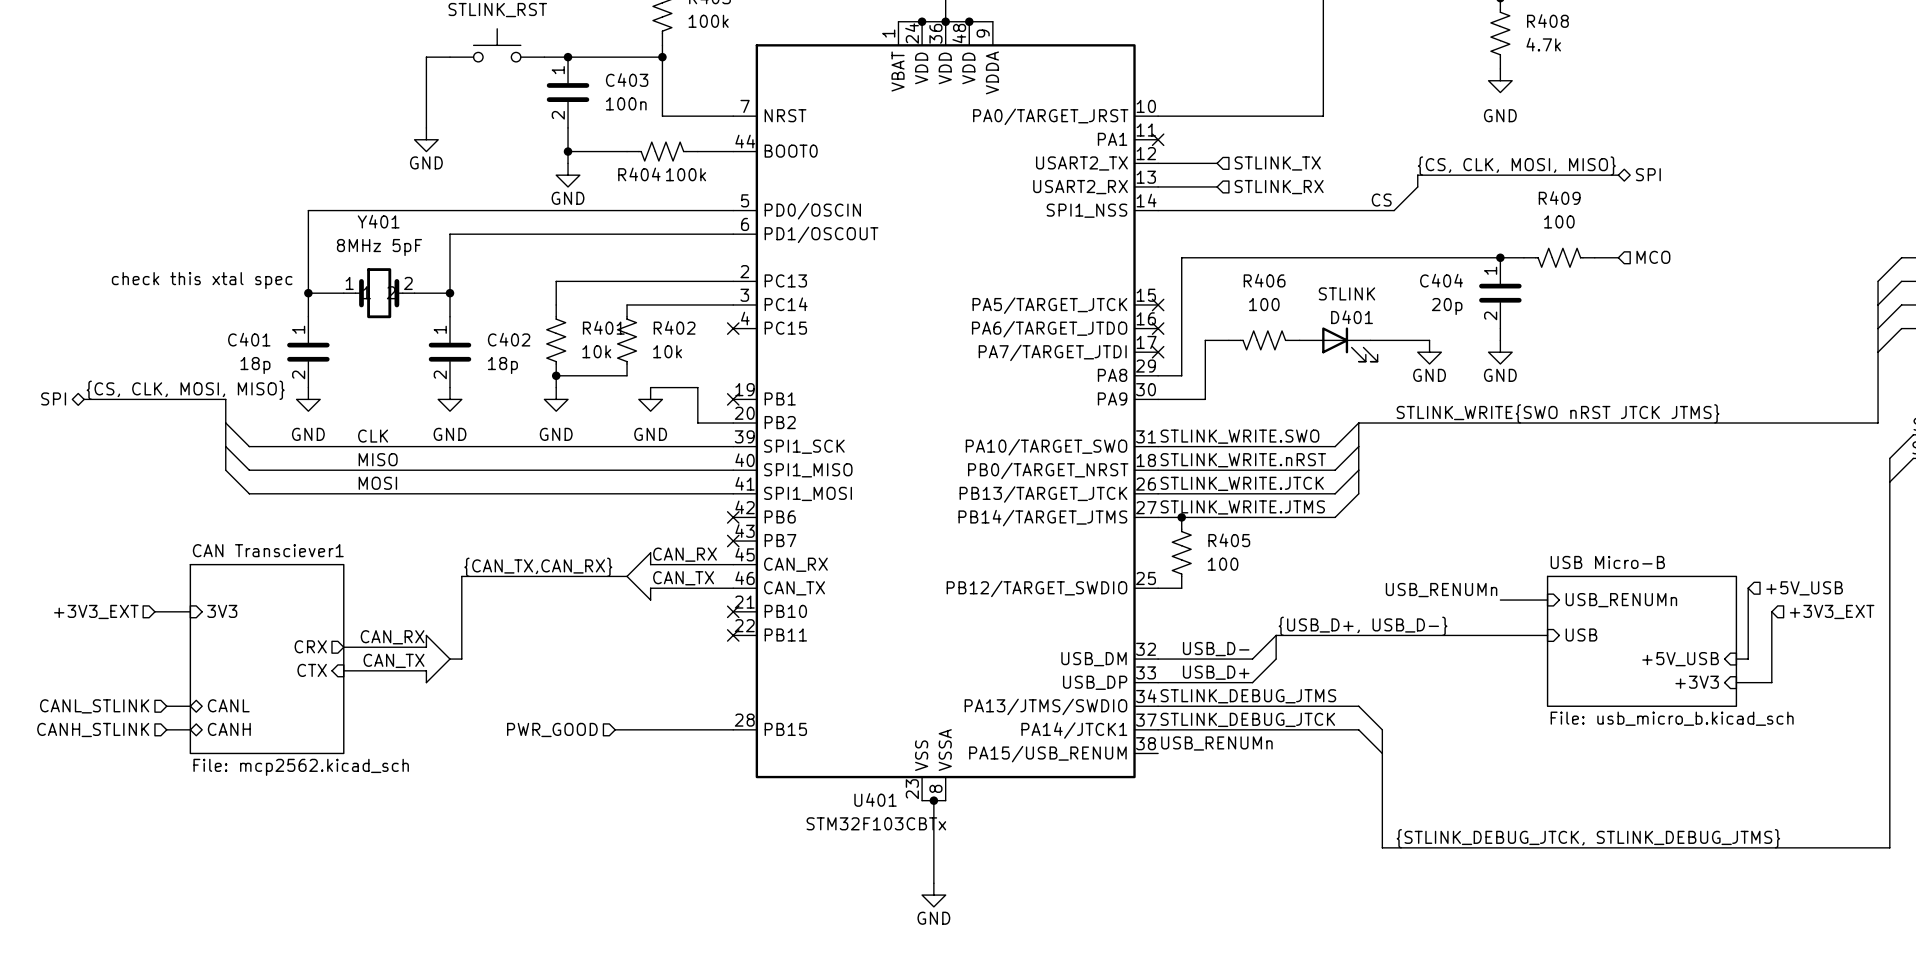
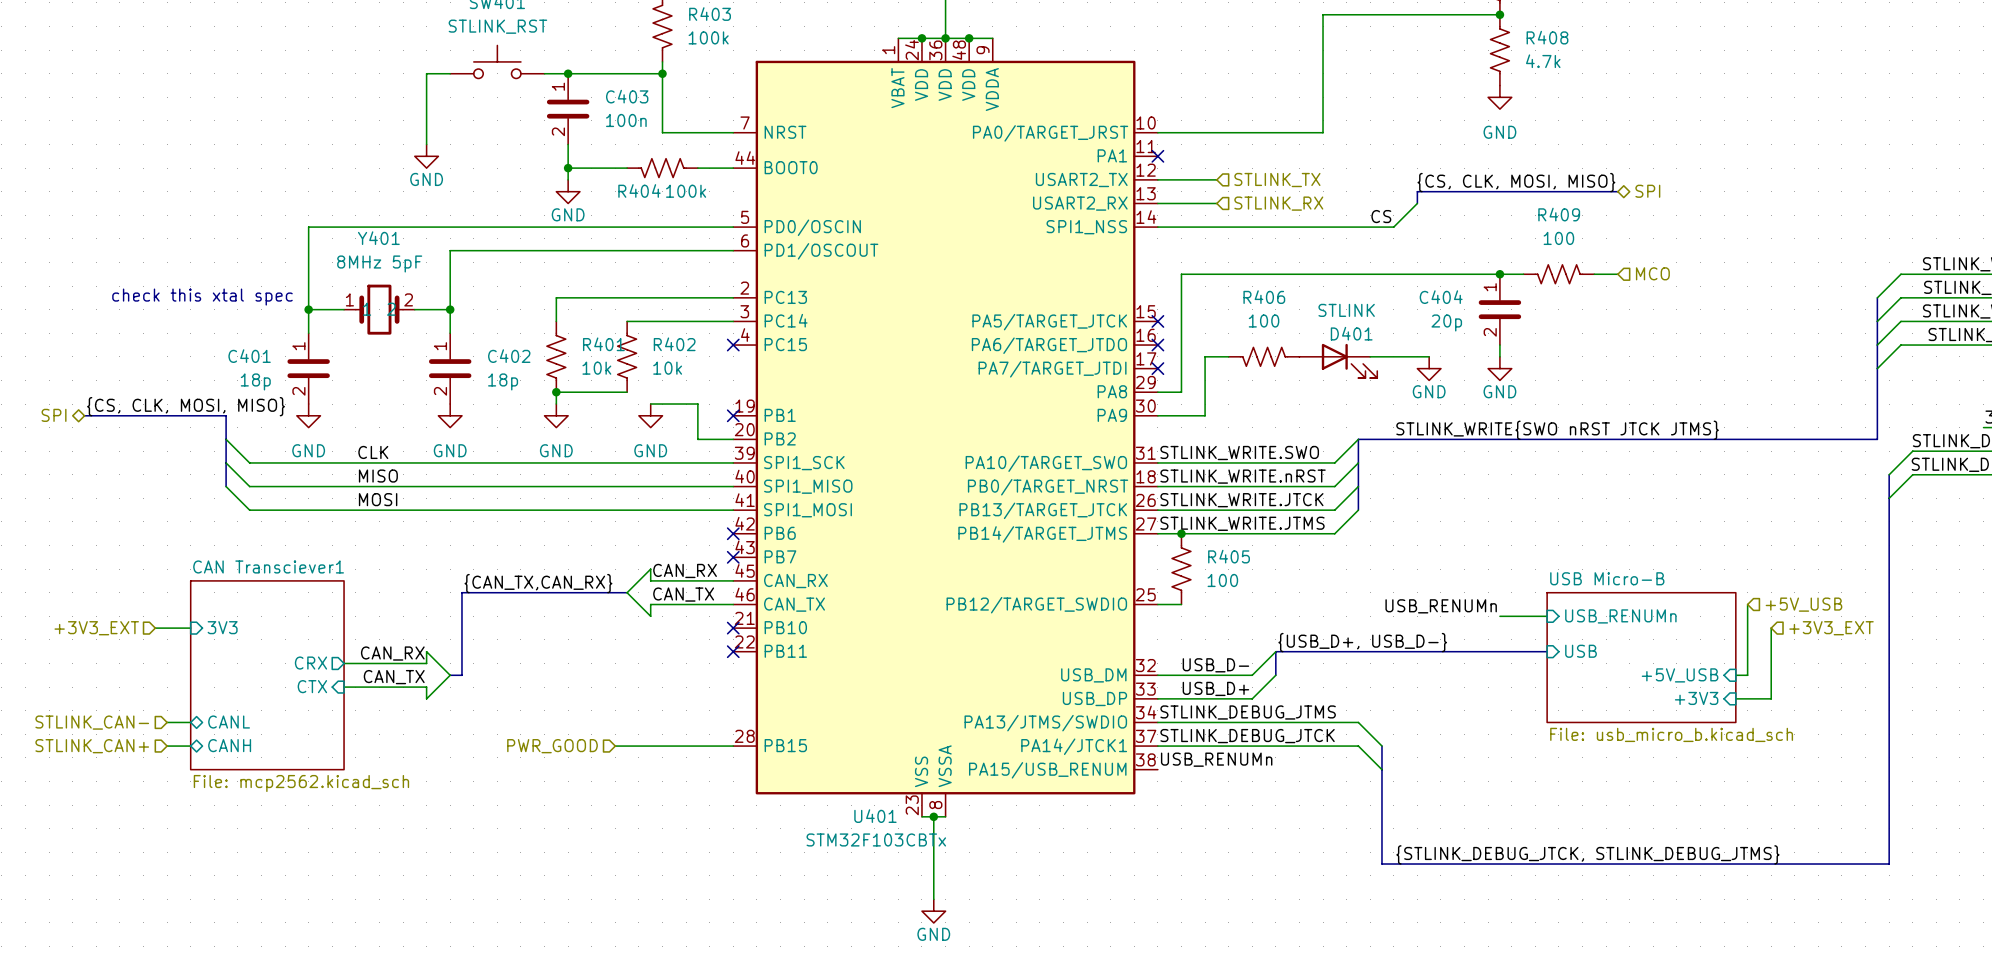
hierarchical label: CANL_STLINK (94, 706) -> STLINK_CAN- (92, 722)
hierarchical label: CANH_STLINK (93, 729) -> STLINK_CAN+ (92, 746)

